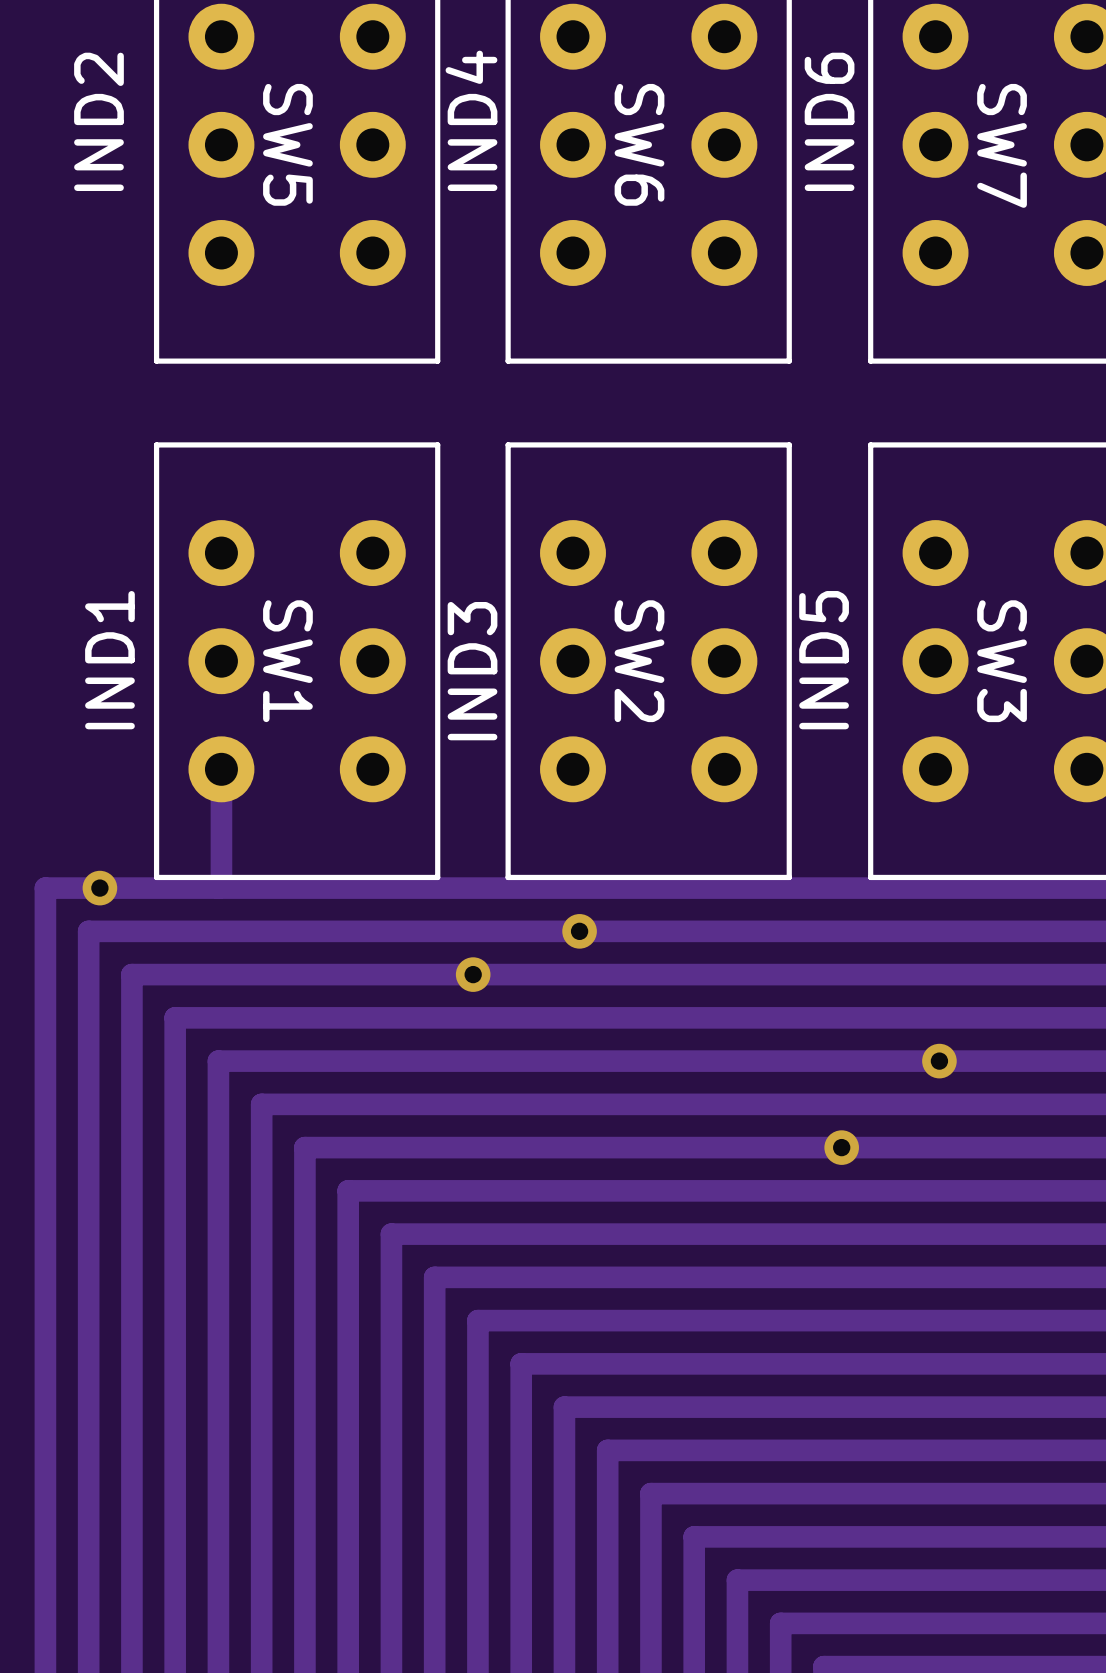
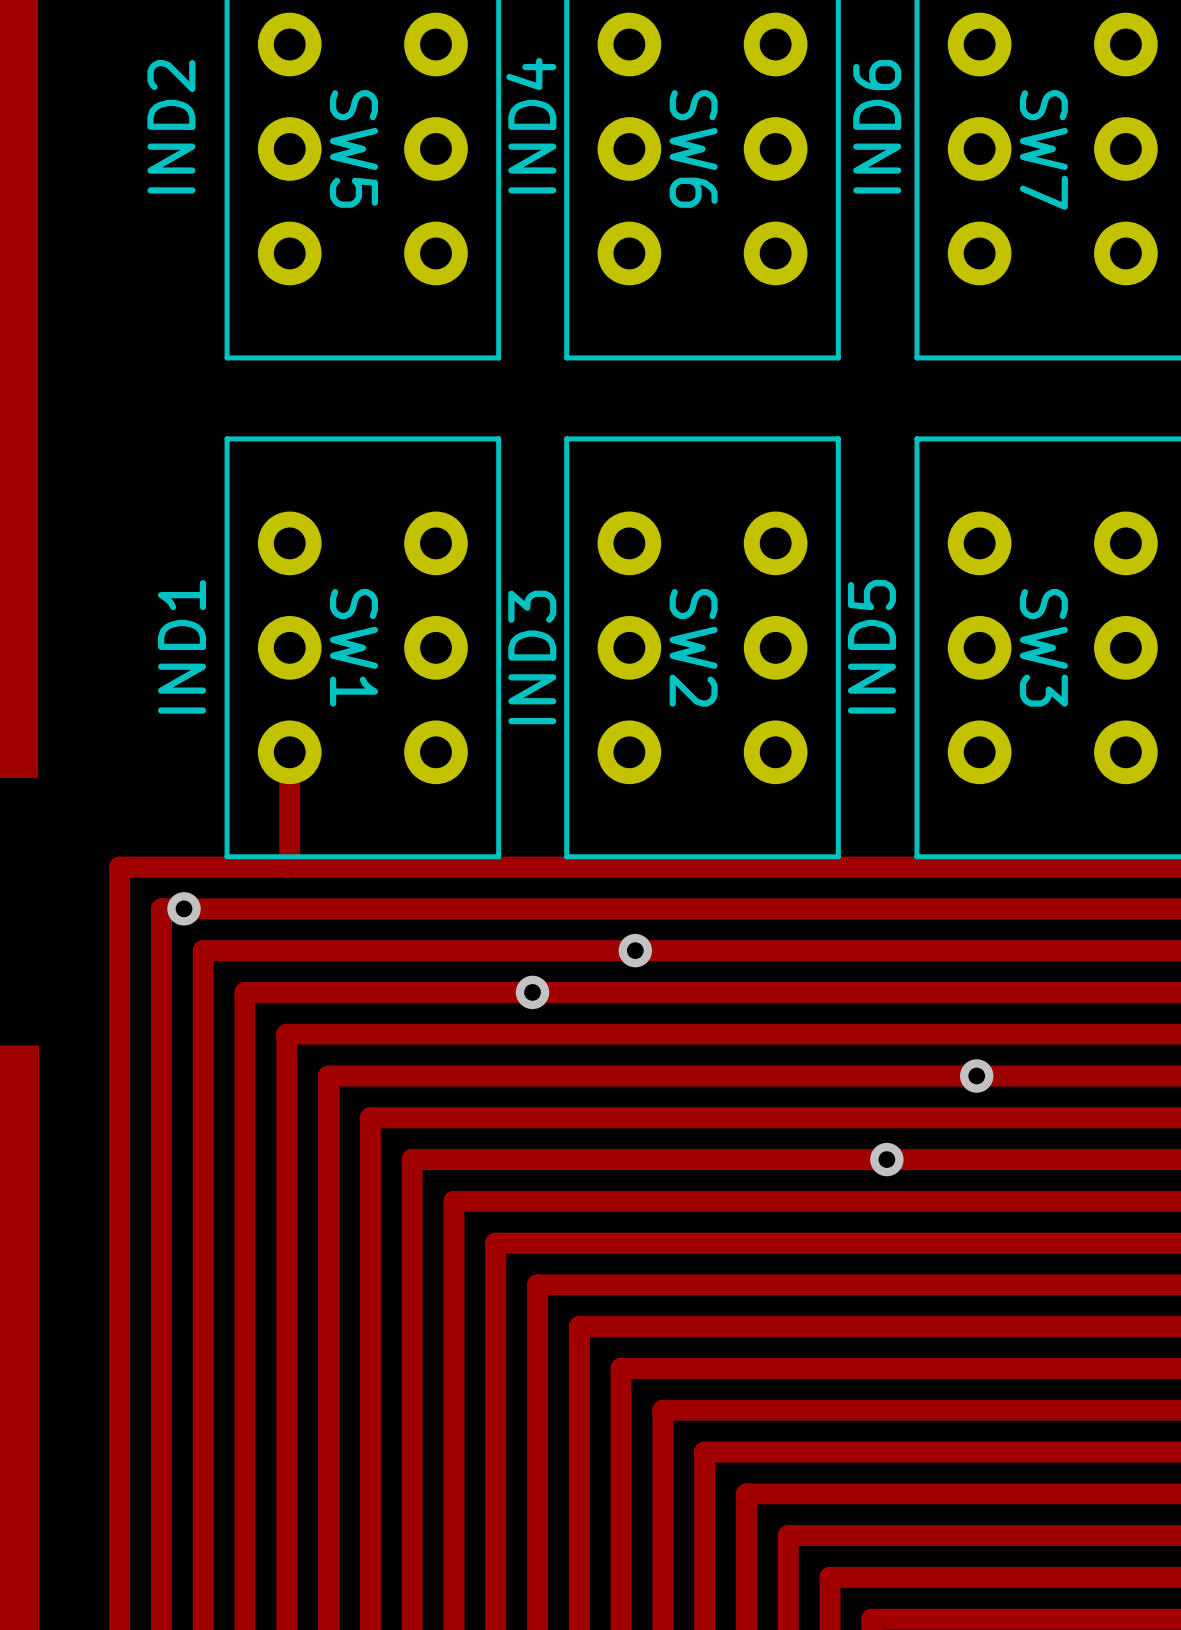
via position: (99, 888) -> (184, 908)
via position: (579, 931) -> (635, 950)
via position: (473, 974) -> (532, 992)
via position: (939, 1061) -> (976, 1075)
via position: (841, 1147) -> (886, 1159)

